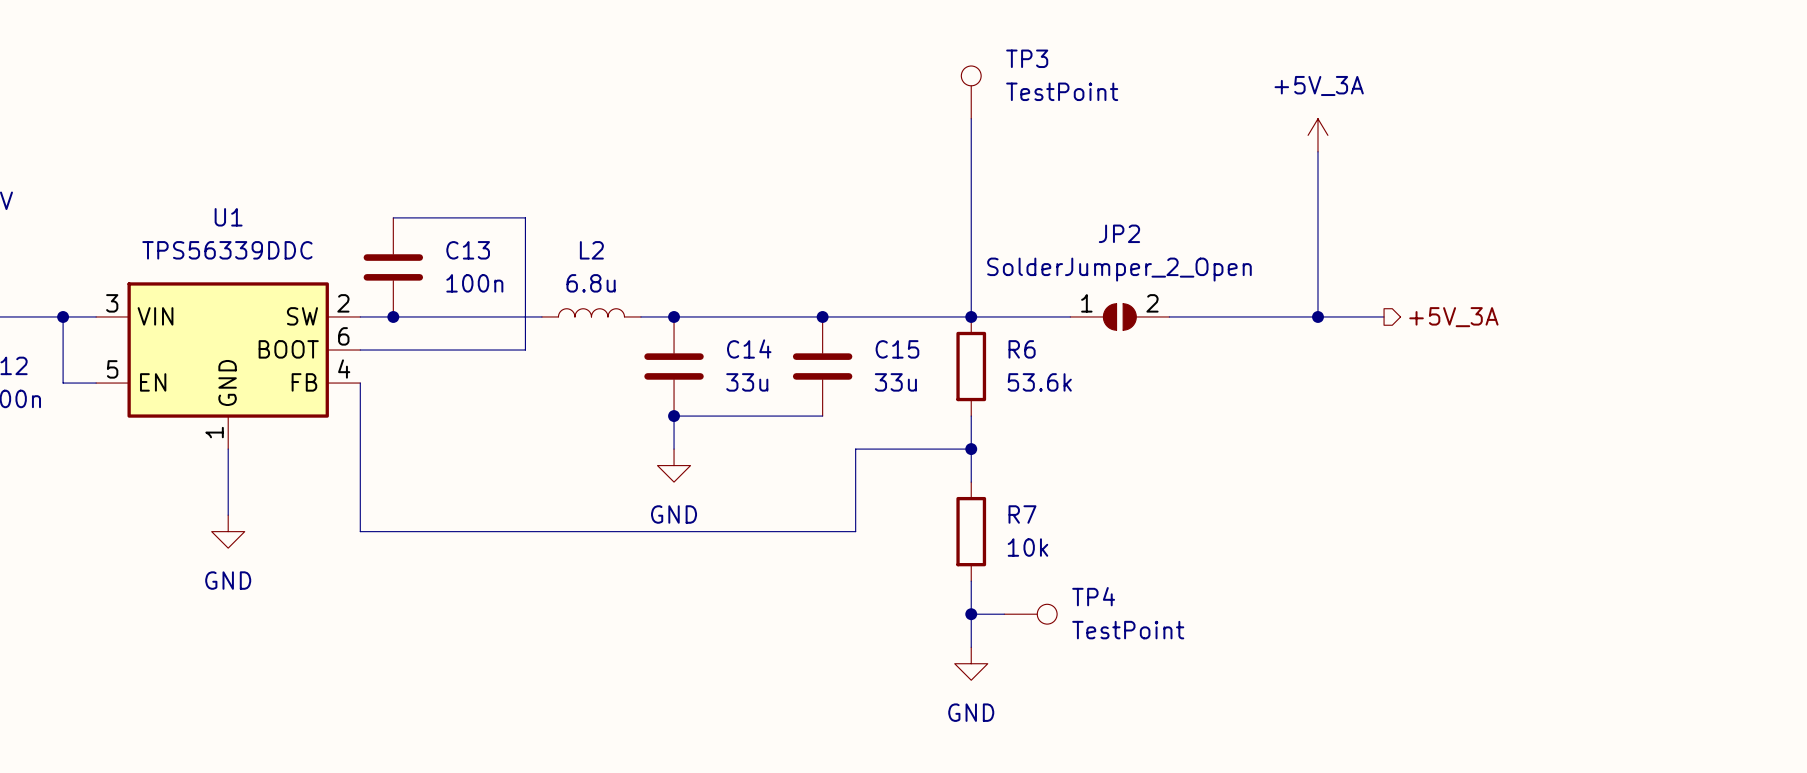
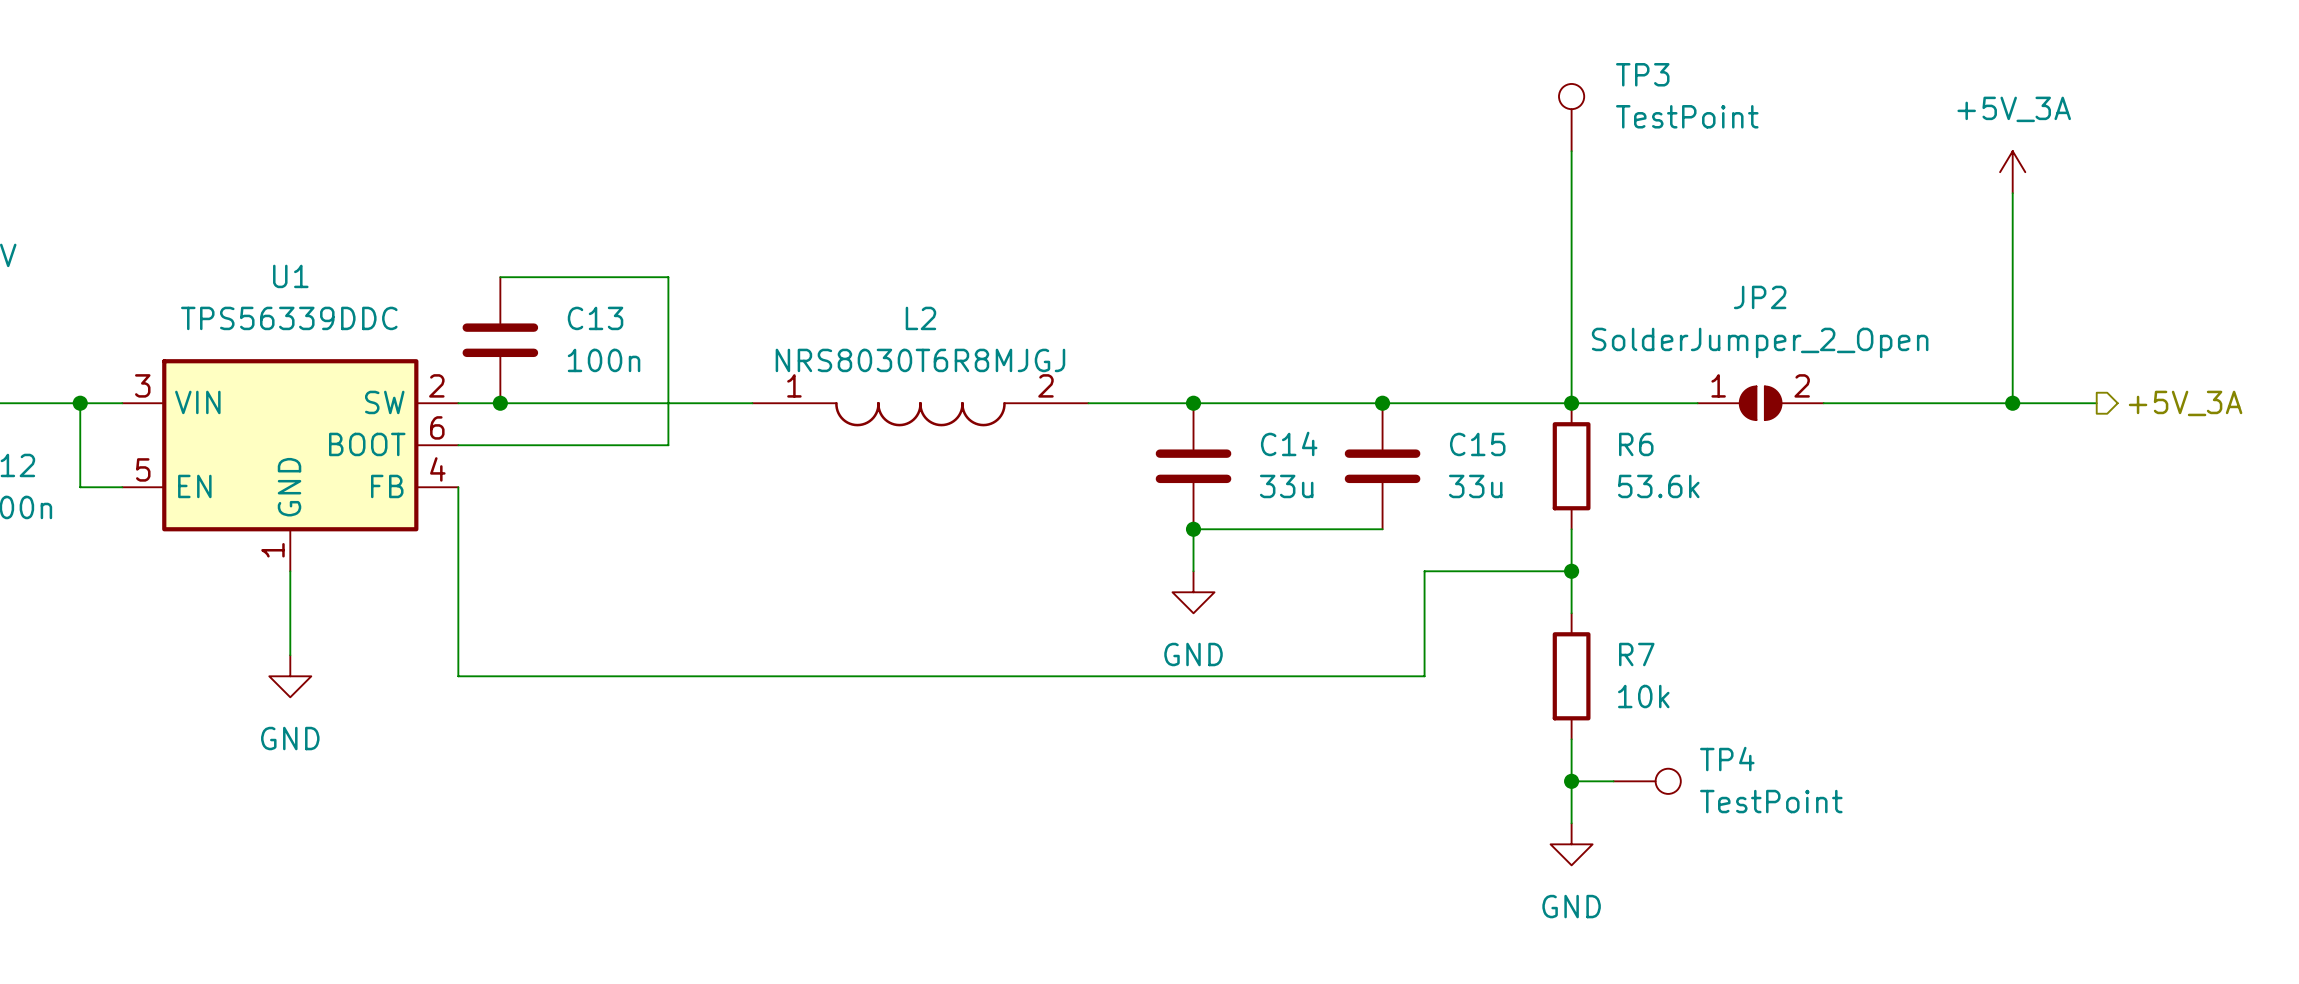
TP3 position: (971, 92) -> (1571, 117)
wire: (971, 118) (971, 316) -> (1571, 151) (1571, 403)
power symbol position: +5V_3A (1317, 135) -> +5V_3A (2012, 172)
wire: (1317, 151) (1317, 316) -> (2012, 193) (2012, 403)
L2 value: 6.8u (591, 283) -> NRS8030T6R8MJGJ (920, 360)
L2 symbol: [541, 308, 642, 317] -> [752, 401, 1089, 427]
wire: none -> (689, 403) (752, 403)
wire: (641, 316) (855, 316) -> none
junction: (674, 316) -> none
junction: (822, 316) -> none
junction position: (971, 316) -> (1193, 403)
junction: none -> (1382, 403)
JP2 position: (1119, 316) -> (1760, 403)
junction: none -> (1571, 403)
junction: (1317, 316) -> none
wire: none -> (1823, 403) (2096, 403)
junction: none -> (2012, 403)
hierarchical label position: +5V_3A (1453, 317) -> +5V_3A (2185, 403)
C14 position: (674, 366) -> (1193, 466)
C15 position: (822, 366) -> (1382, 466)
R6 position: (971, 366) -> (1571, 466)
junction: (674, 416) -> none
wire: (822, 416) (674, 416) (674, 449) -> (1382, 529) (1193, 529) (1193, 571)
wire: (971, 416) (971, 482) -> (1571, 529) (1571, 613)
wire: (971, 449) (855, 449) (855, 531) -> (1571, 571) (1424, 571) (1424, 676) (1088, 676)
junction position: (971, 449) -> (1193, 529)
junction: none -> (1571, 571)
power symbol: GND (674, 465) -> none
power symbol: none -> GND (1193, 592)
R7 position: (971, 531) -> (1571, 676)
wire: (971, 581) (971, 647) -> (1571, 739) (1571, 823)
wire: (971, 614) (1004, 614) -> (1571, 781) (1613, 781)
junction: (971, 614) -> none
TP4 position: (1030, 614) -> (1647, 781)
junction: none -> (1571, 781)
power symbol: GND (971, 663) -> none
power symbol: none -> GND (1571, 844)

